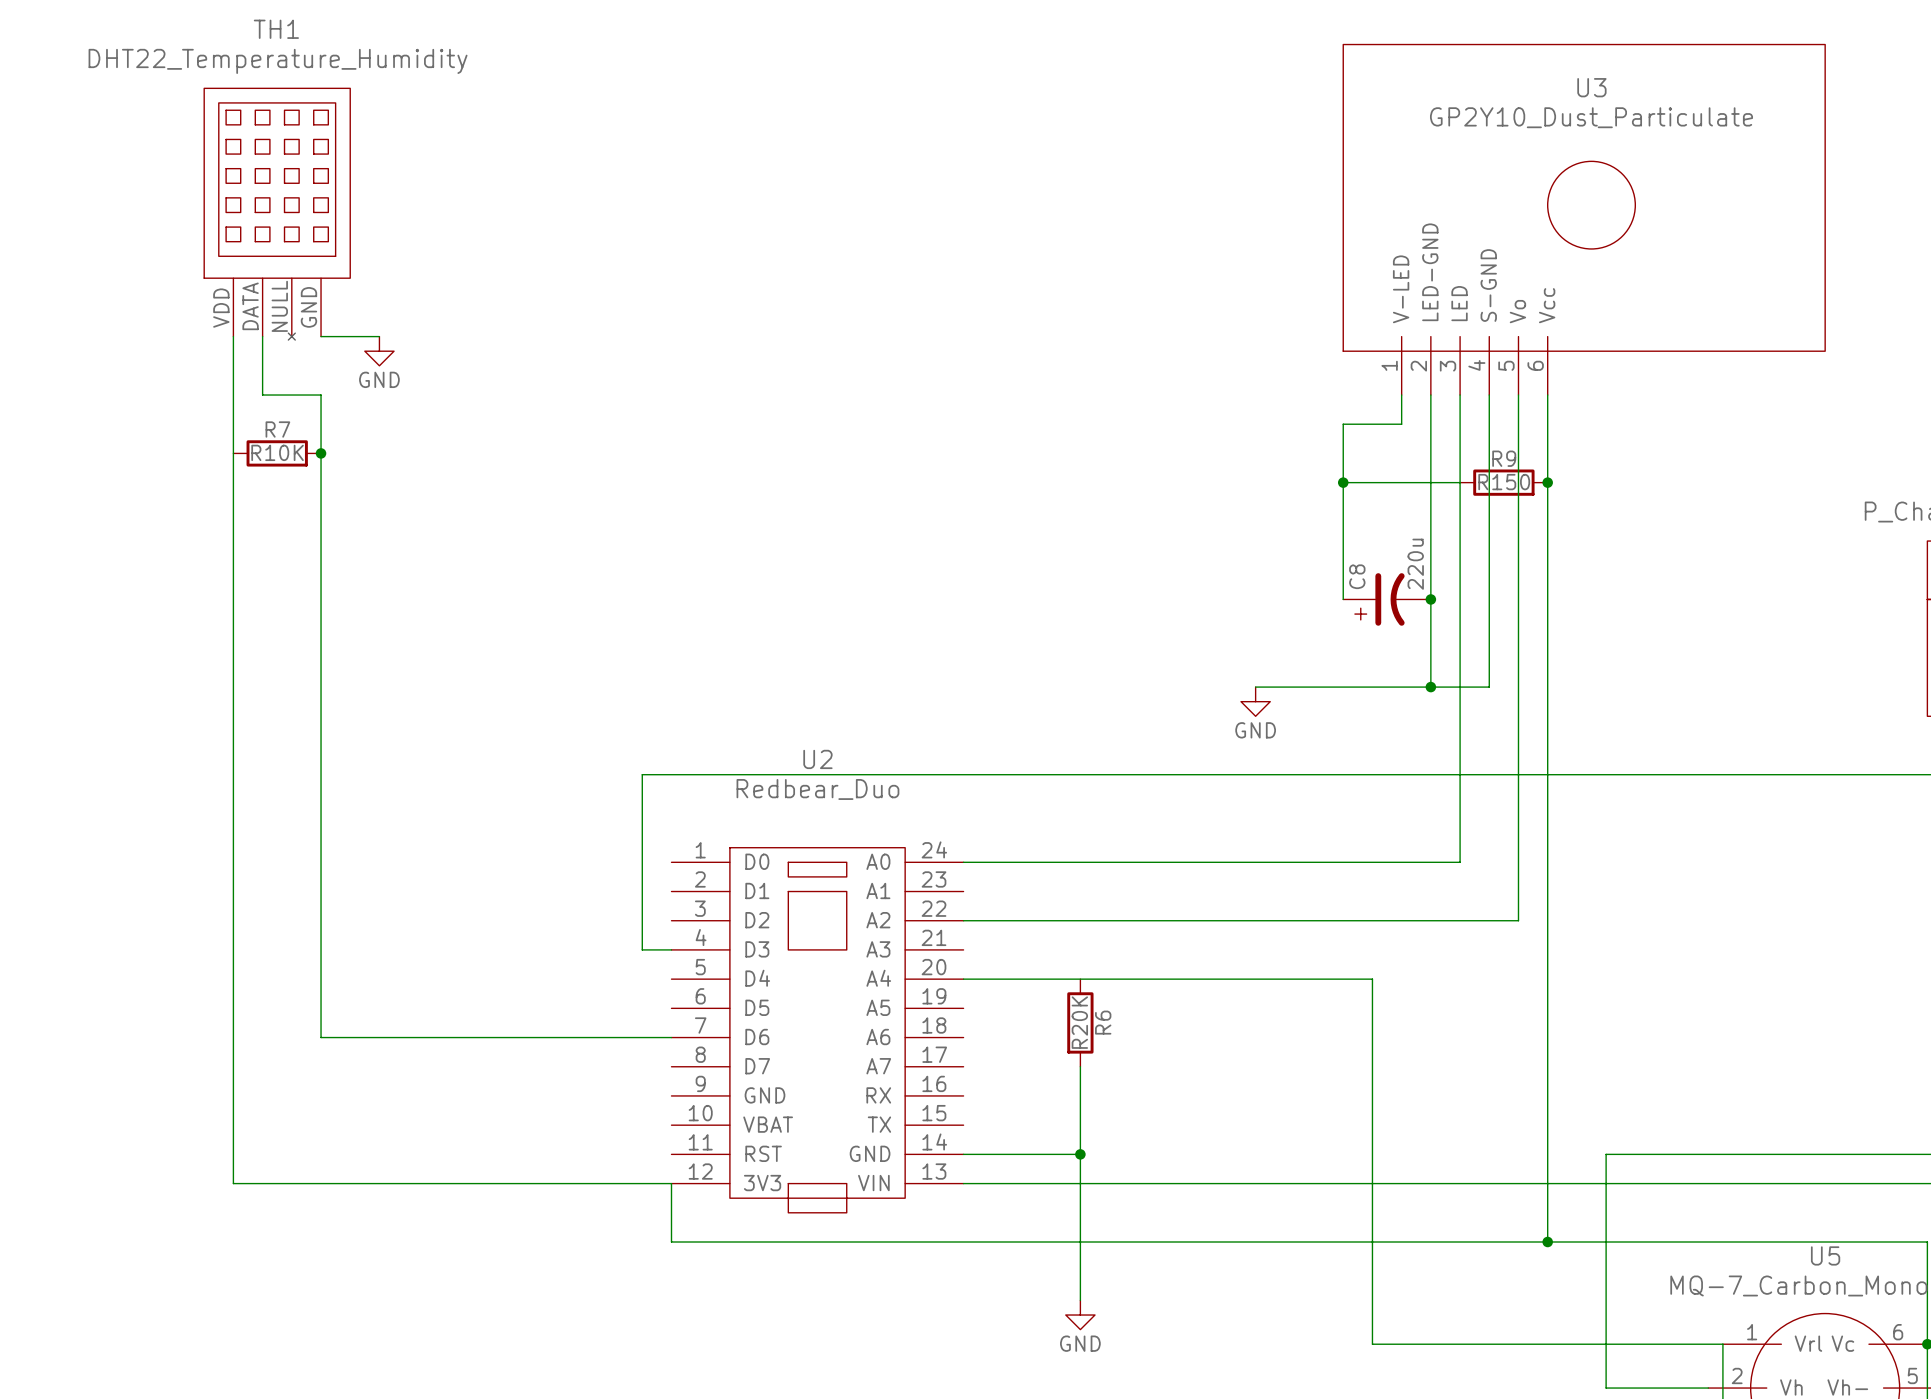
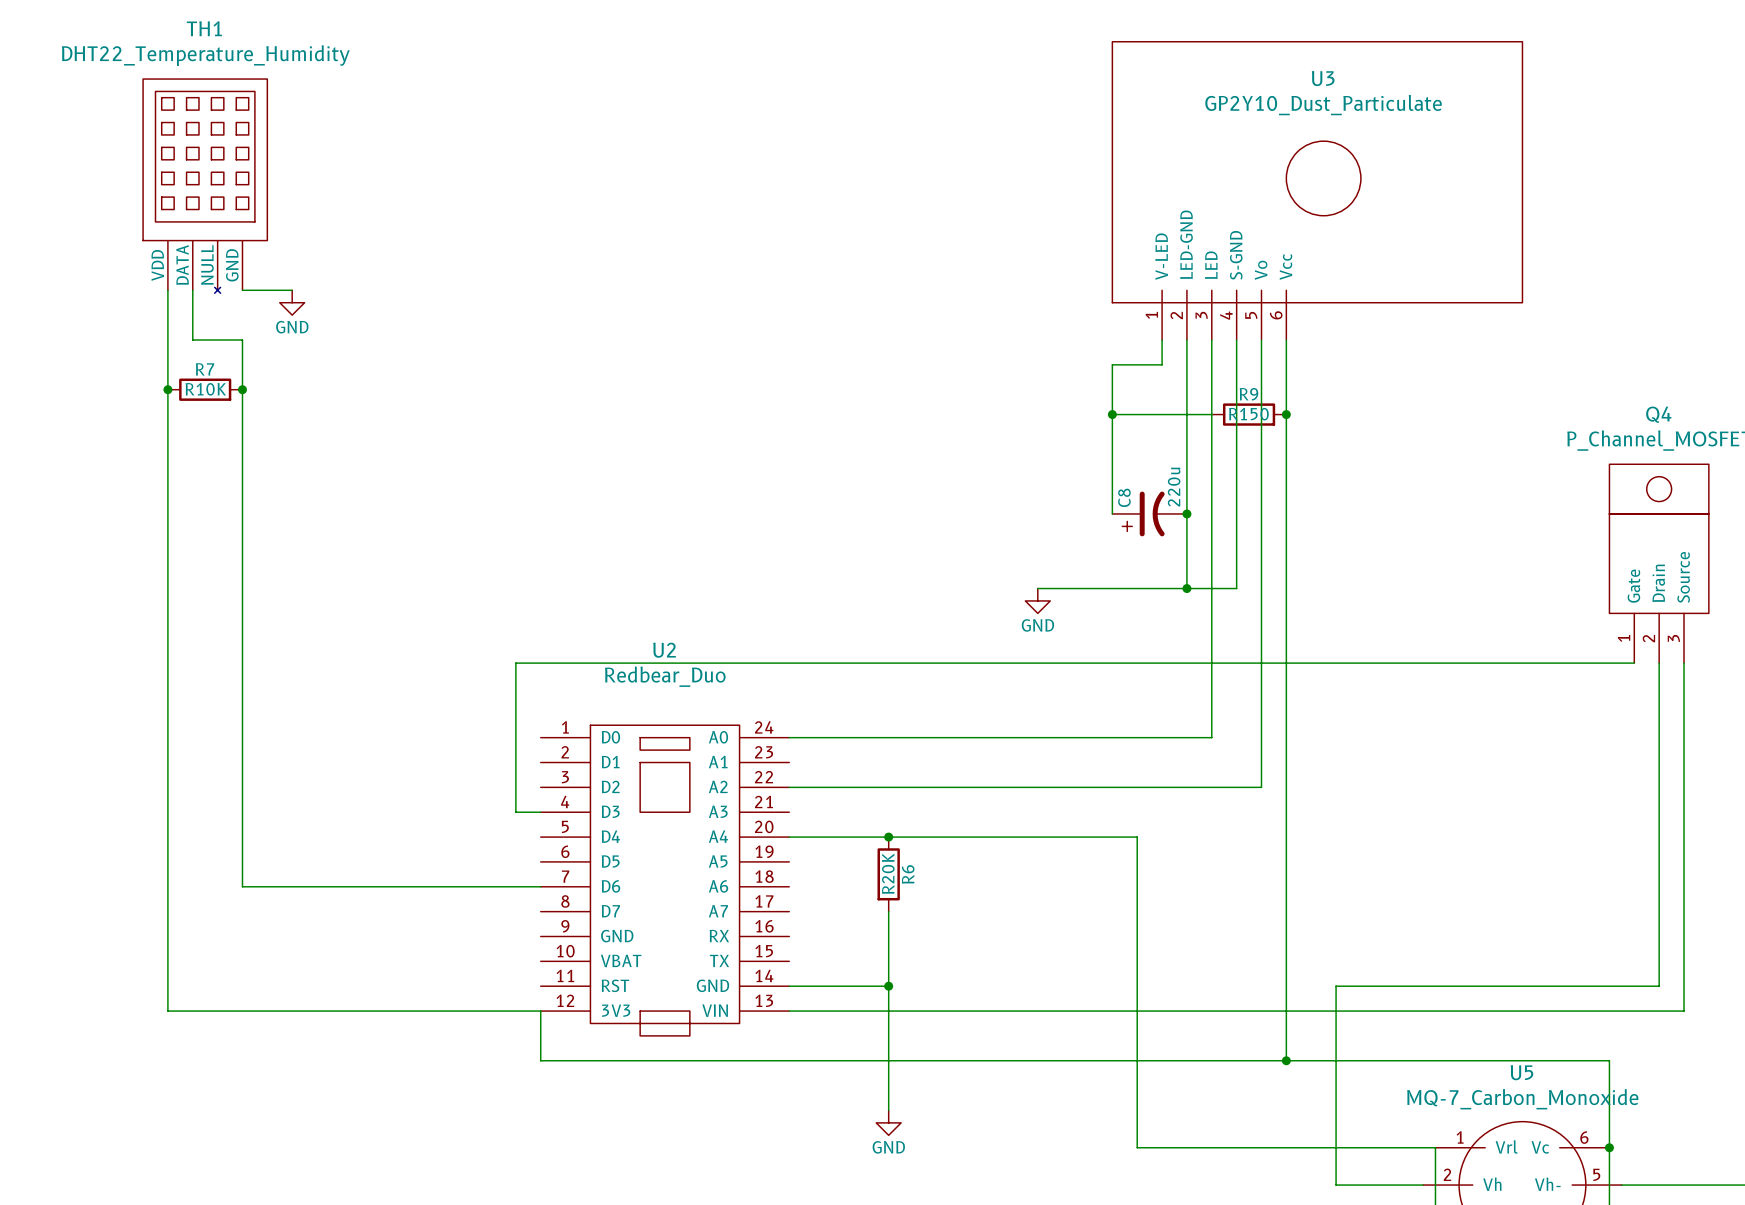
junction: none -> (167, 389)
junction: none -> (888, 837)

